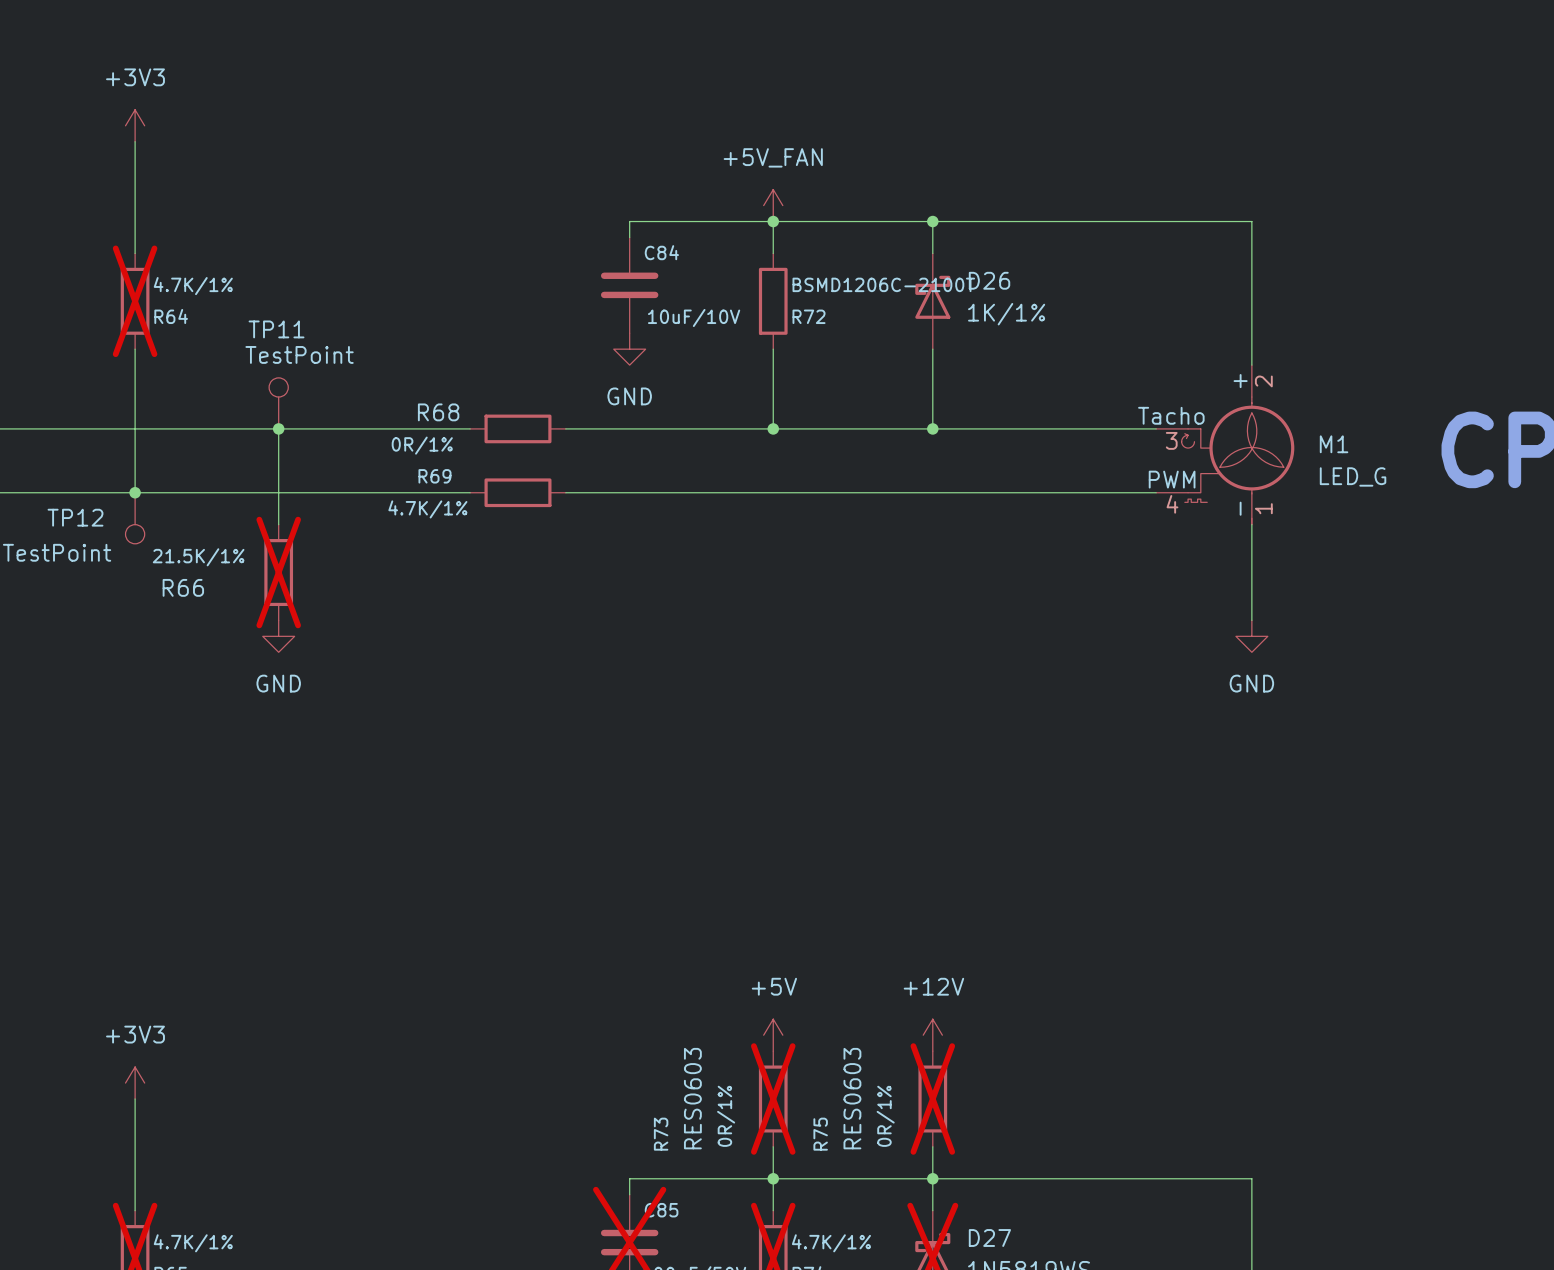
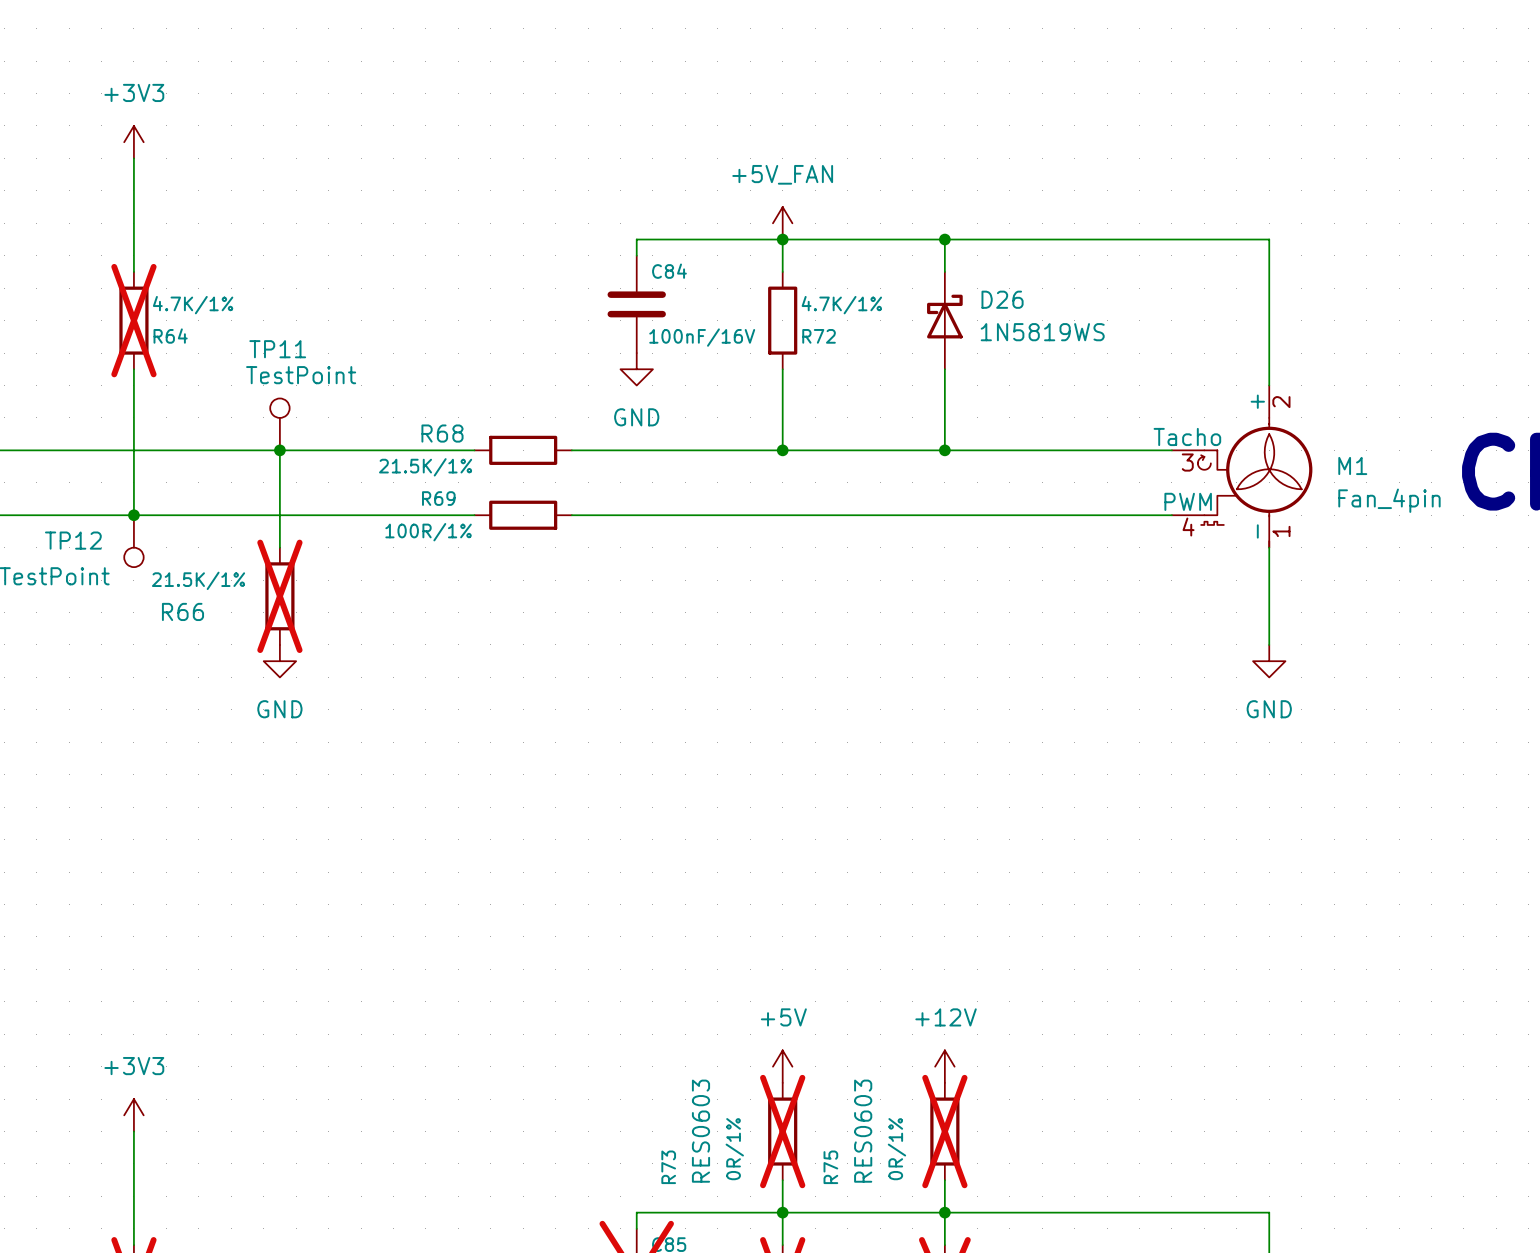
R72 value: BSMD1206C-2100T (883, 284) -> 4.7K/1% (841, 305)
D26 value: 1K/1% (1006, 314) -> 1N5819WS (1042, 332)
C84 value: 10uF/10V (694, 317) -> 100nF/16V (702, 337)
R68 value: 0R/1% (422, 445) -> 21.5K/1% (425, 467)
M1 value: LED_G (1353, 476) -> Fan_4pin (1389, 500)
R69 value: 4.7K/1% (427, 509) -> 100R/1% (428, 532)

